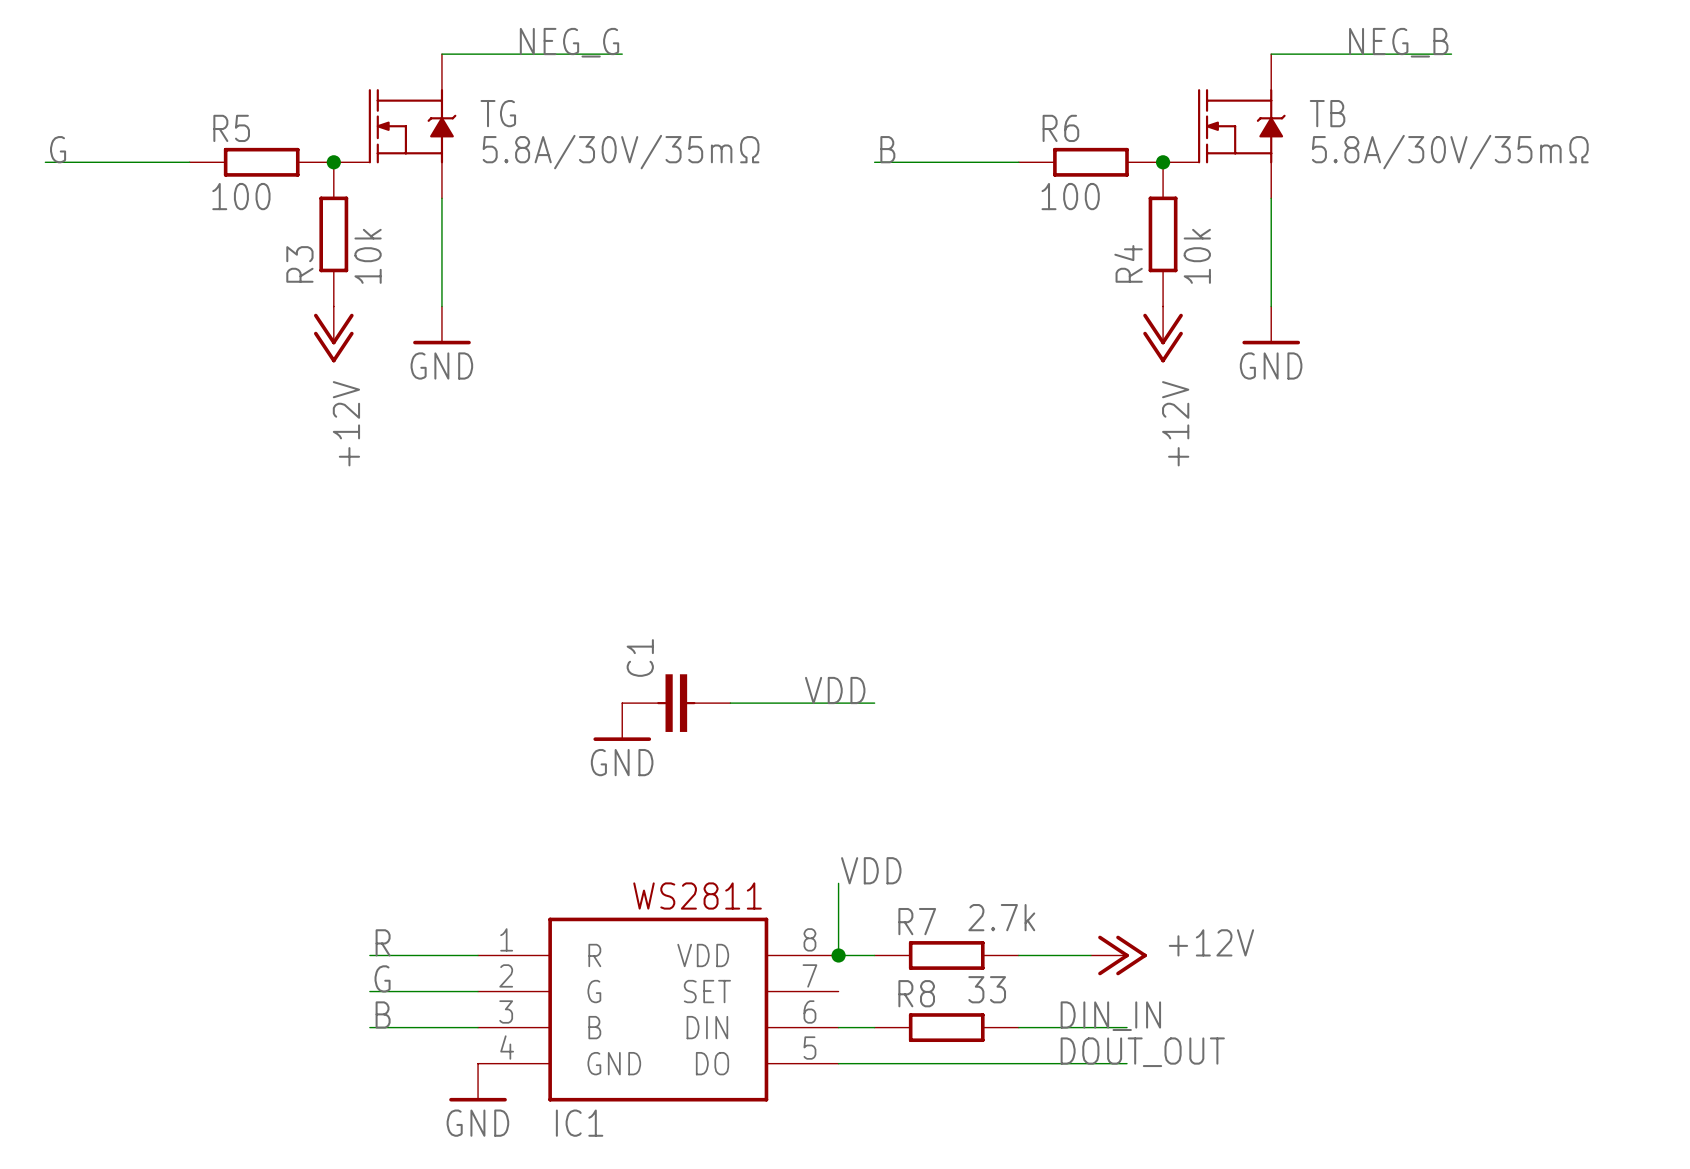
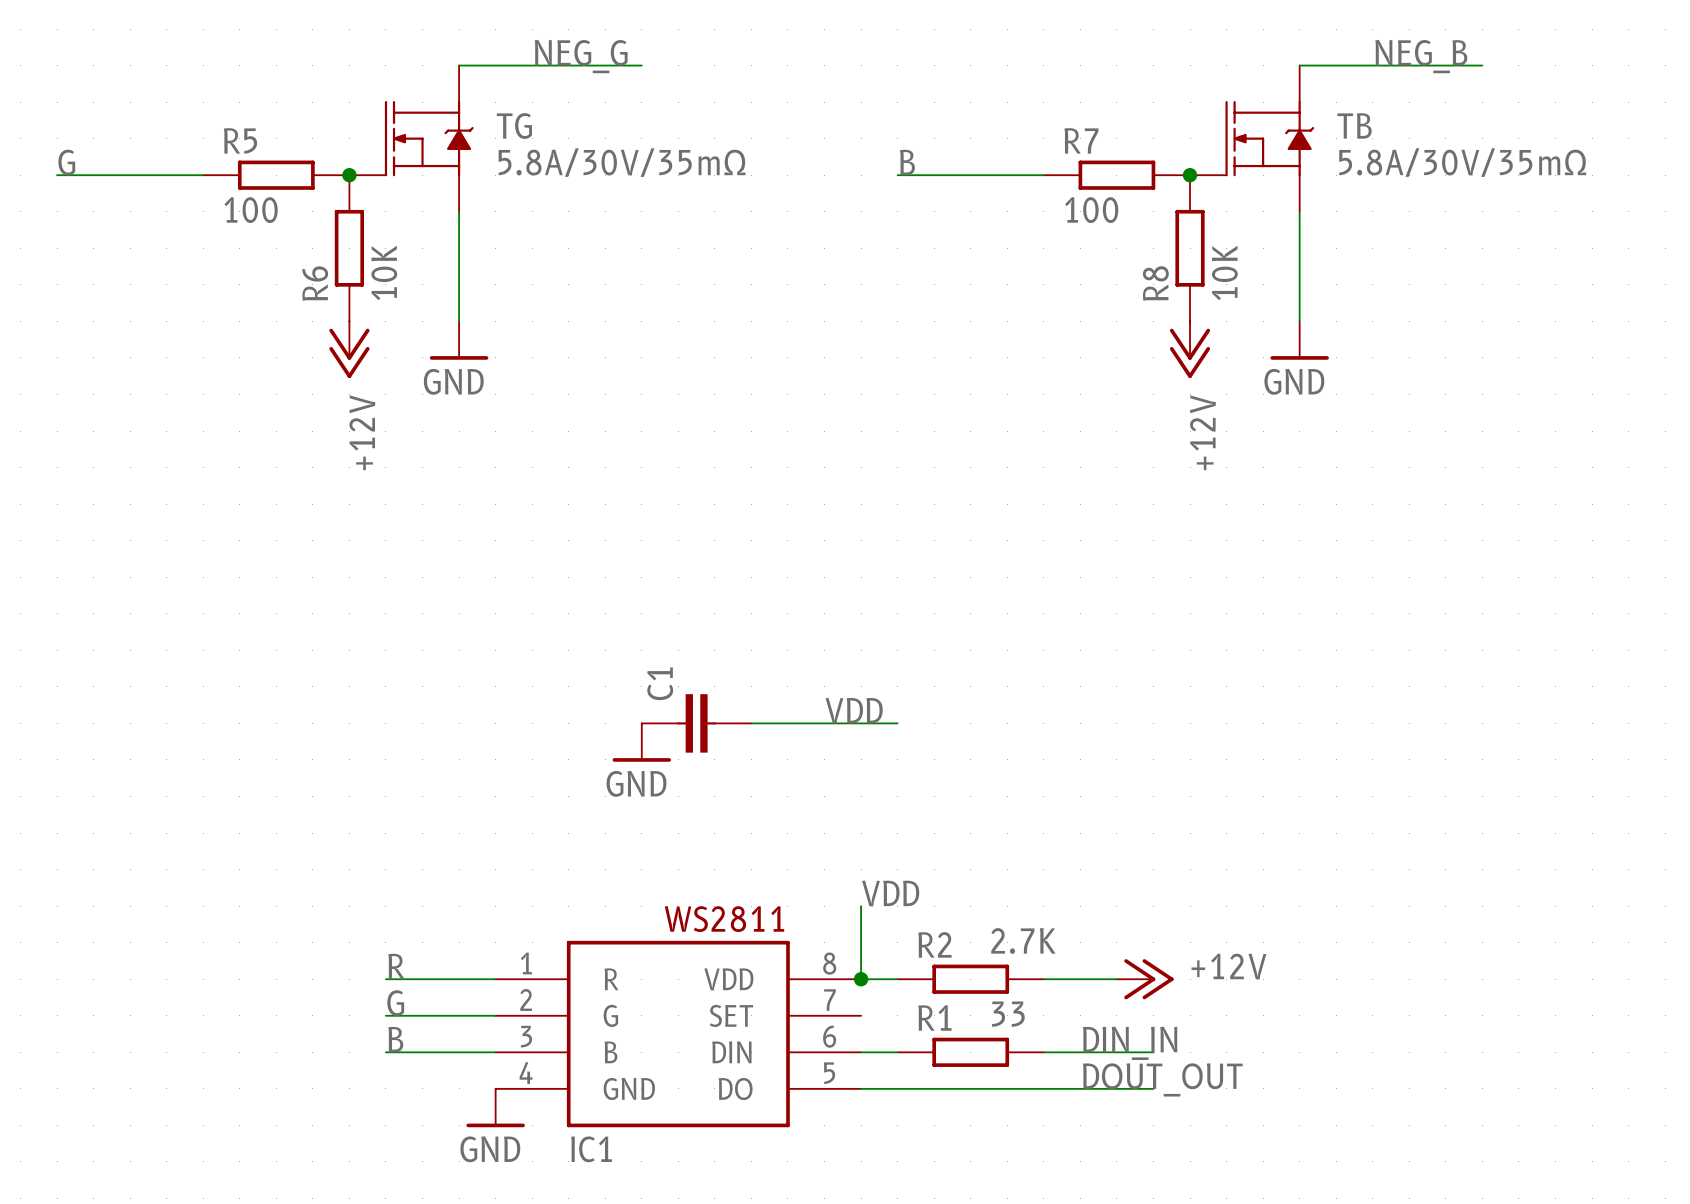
R6 name: R6 (1060, 128) -> R7 (1081, 140)
R3 value: 10k (368, 256) -> 10K (384, 272)
R4 value: 10k (1197, 256) -> 10K (1224, 272)
R4 name: R4 (1128, 263) -> R8 (1155, 283)
R3 name: R3 (299, 264) -> R6 (315, 283)
R7 value: 2.7k (1001, 917) -> 2.7K (1023, 941)
R7 name: R7 (917, 921) -> R2 (934, 944)
R8 name: R8 (916, 993) -> R1 (934, 1017)

